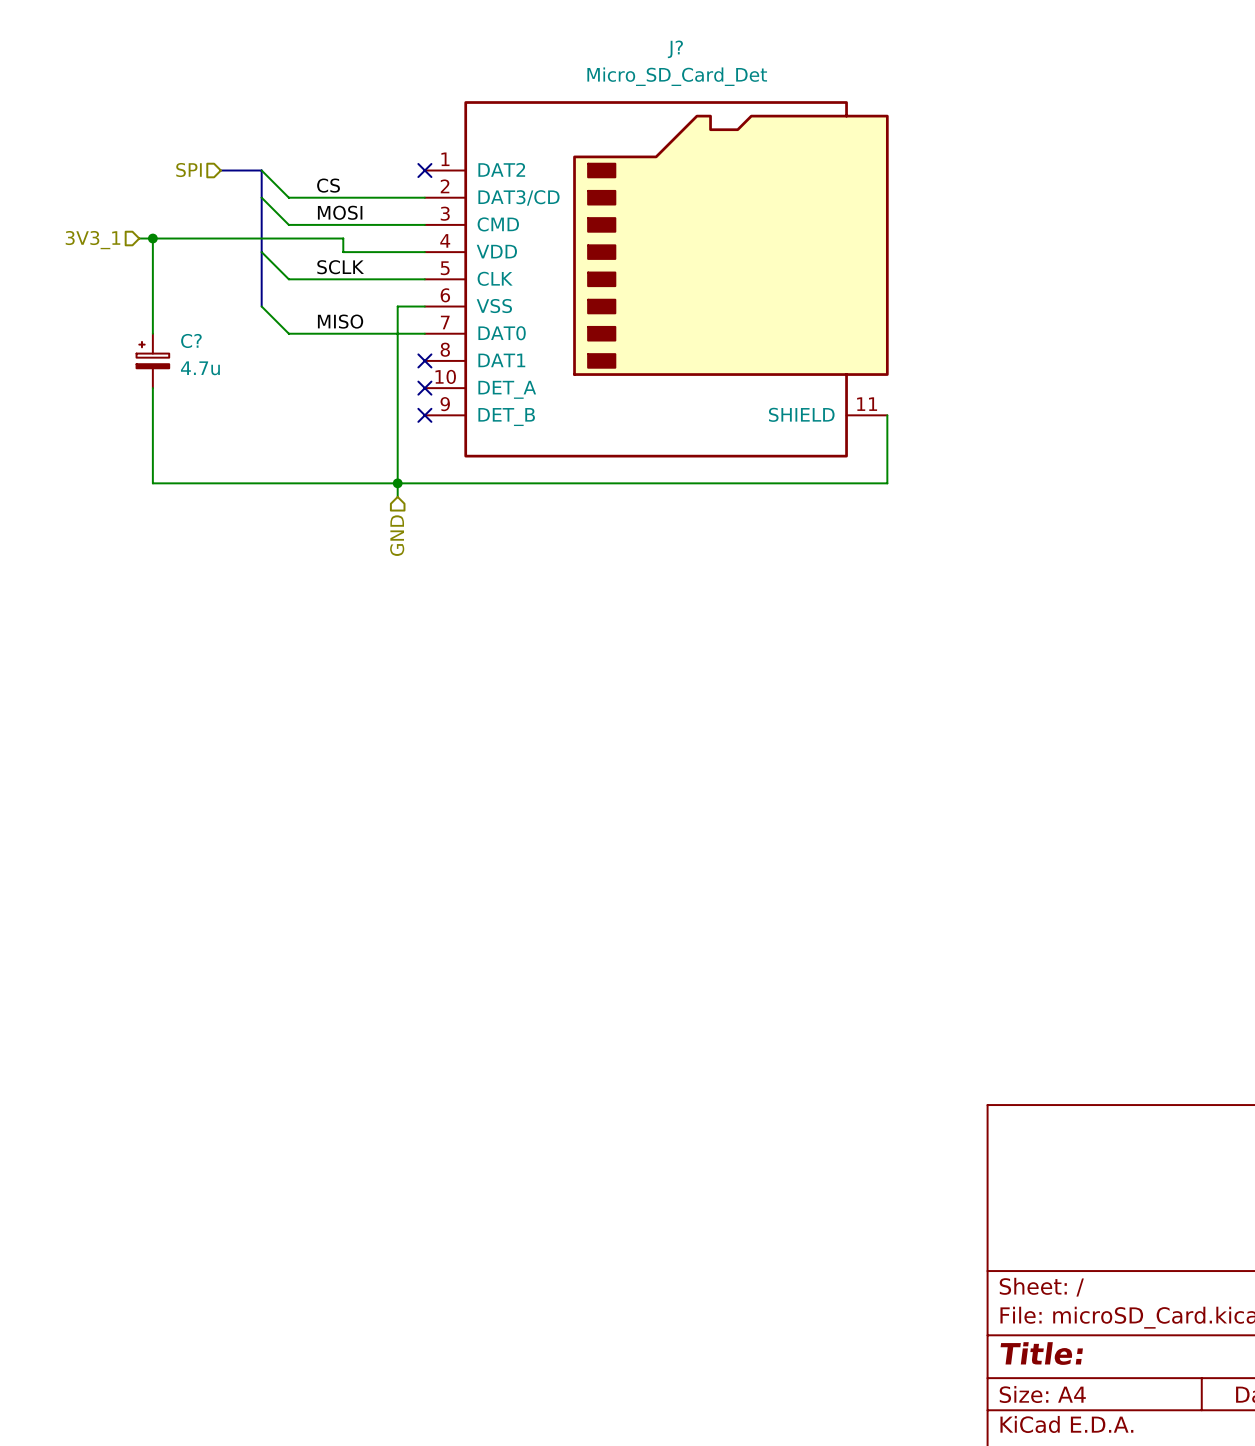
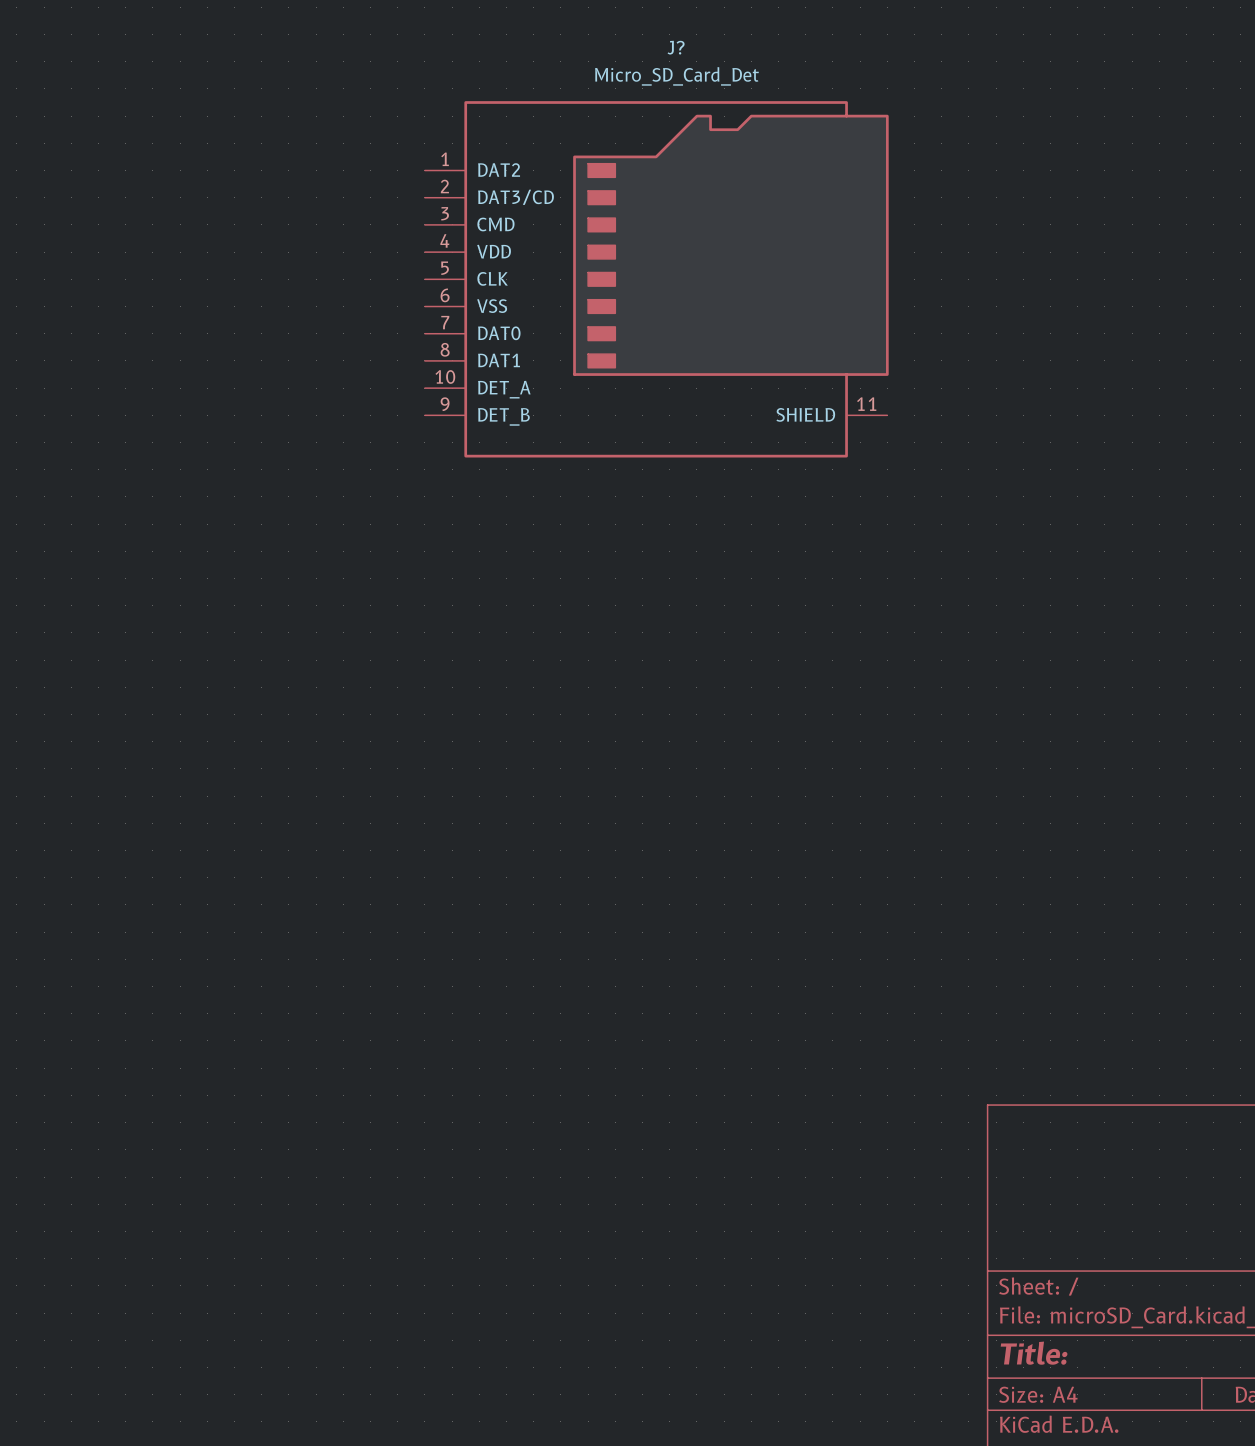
hierarchical label: SPI (189, 170) -> none
bus: (220, 170) (261, 170) (261, 306) -> none
wire: (261, 170) (288, 197) (424, 197) -> none
no-connect mark: (424, 170) -> none
label: CS (328, 185) -> none
wire: (261, 197) (288, 224) (424, 224) -> none
label: MOSI (340, 212) -> none
wire: (139, 238) (343, 238) (343, 252) (424, 252) -> none
wire: (152, 238) (152, 333) -> none
junction: (152, 238) -> none
hierarchical label: 3V3_1 (93, 240) -> none
wire: (261, 252) (288, 279) (424, 279) -> none
label: SCLK (340, 267) -> none
wire: (261, 306) (288, 333) (424, 333) -> none
wire: (424, 306) (397, 306) (397, 496) -> none
label: MISO (340, 321) -> none
C?: 4.7u (152, 360) -> none
no-connect mark: (424, 360) -> none
wire: (152, 388) (152, 483) (887, 483) (887, 415) -> none
no-connect mark: (424, 388) -> none
no-connect mark: (424, 415) -> none
junction: (397, 483) -> none
hierarchical label: GND (397, 535) -> none

